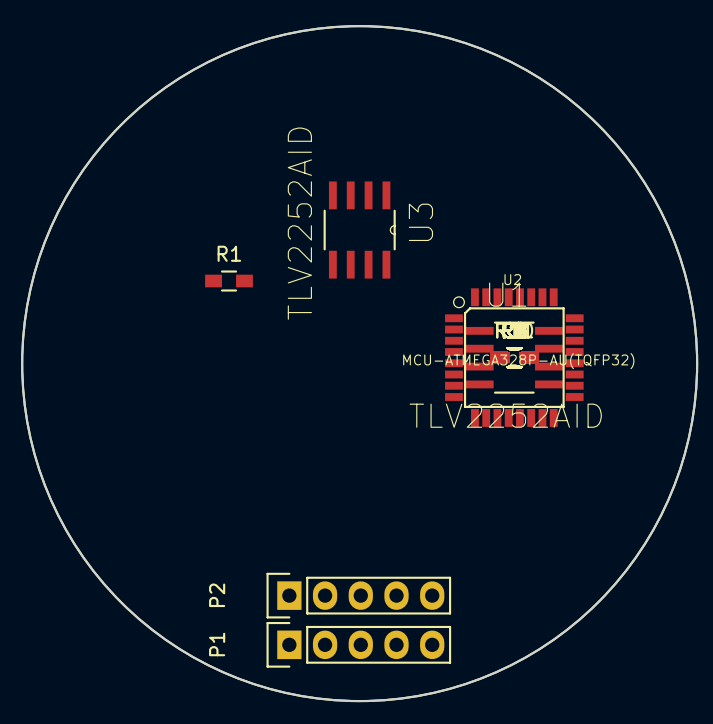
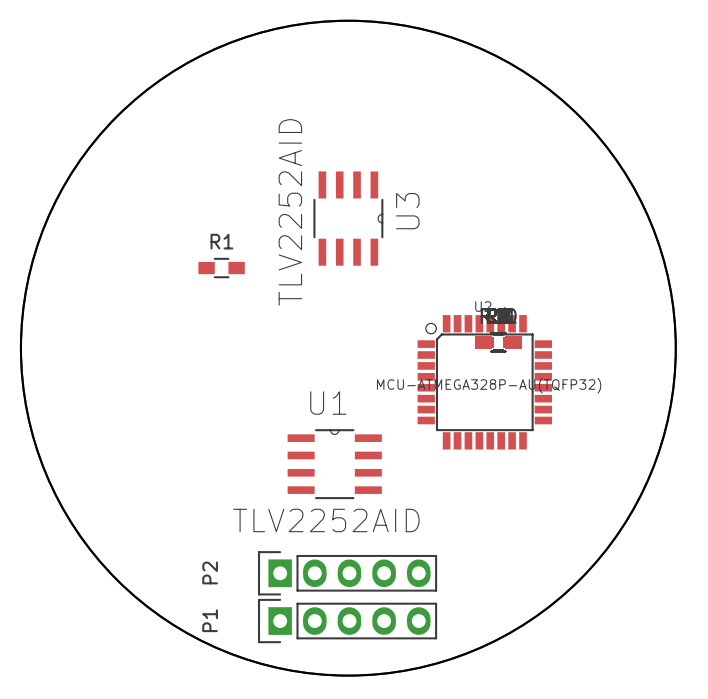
U1 position: (514, 357) -> (334, 464)
U2 position: (514, 357) -> (484, 382)

